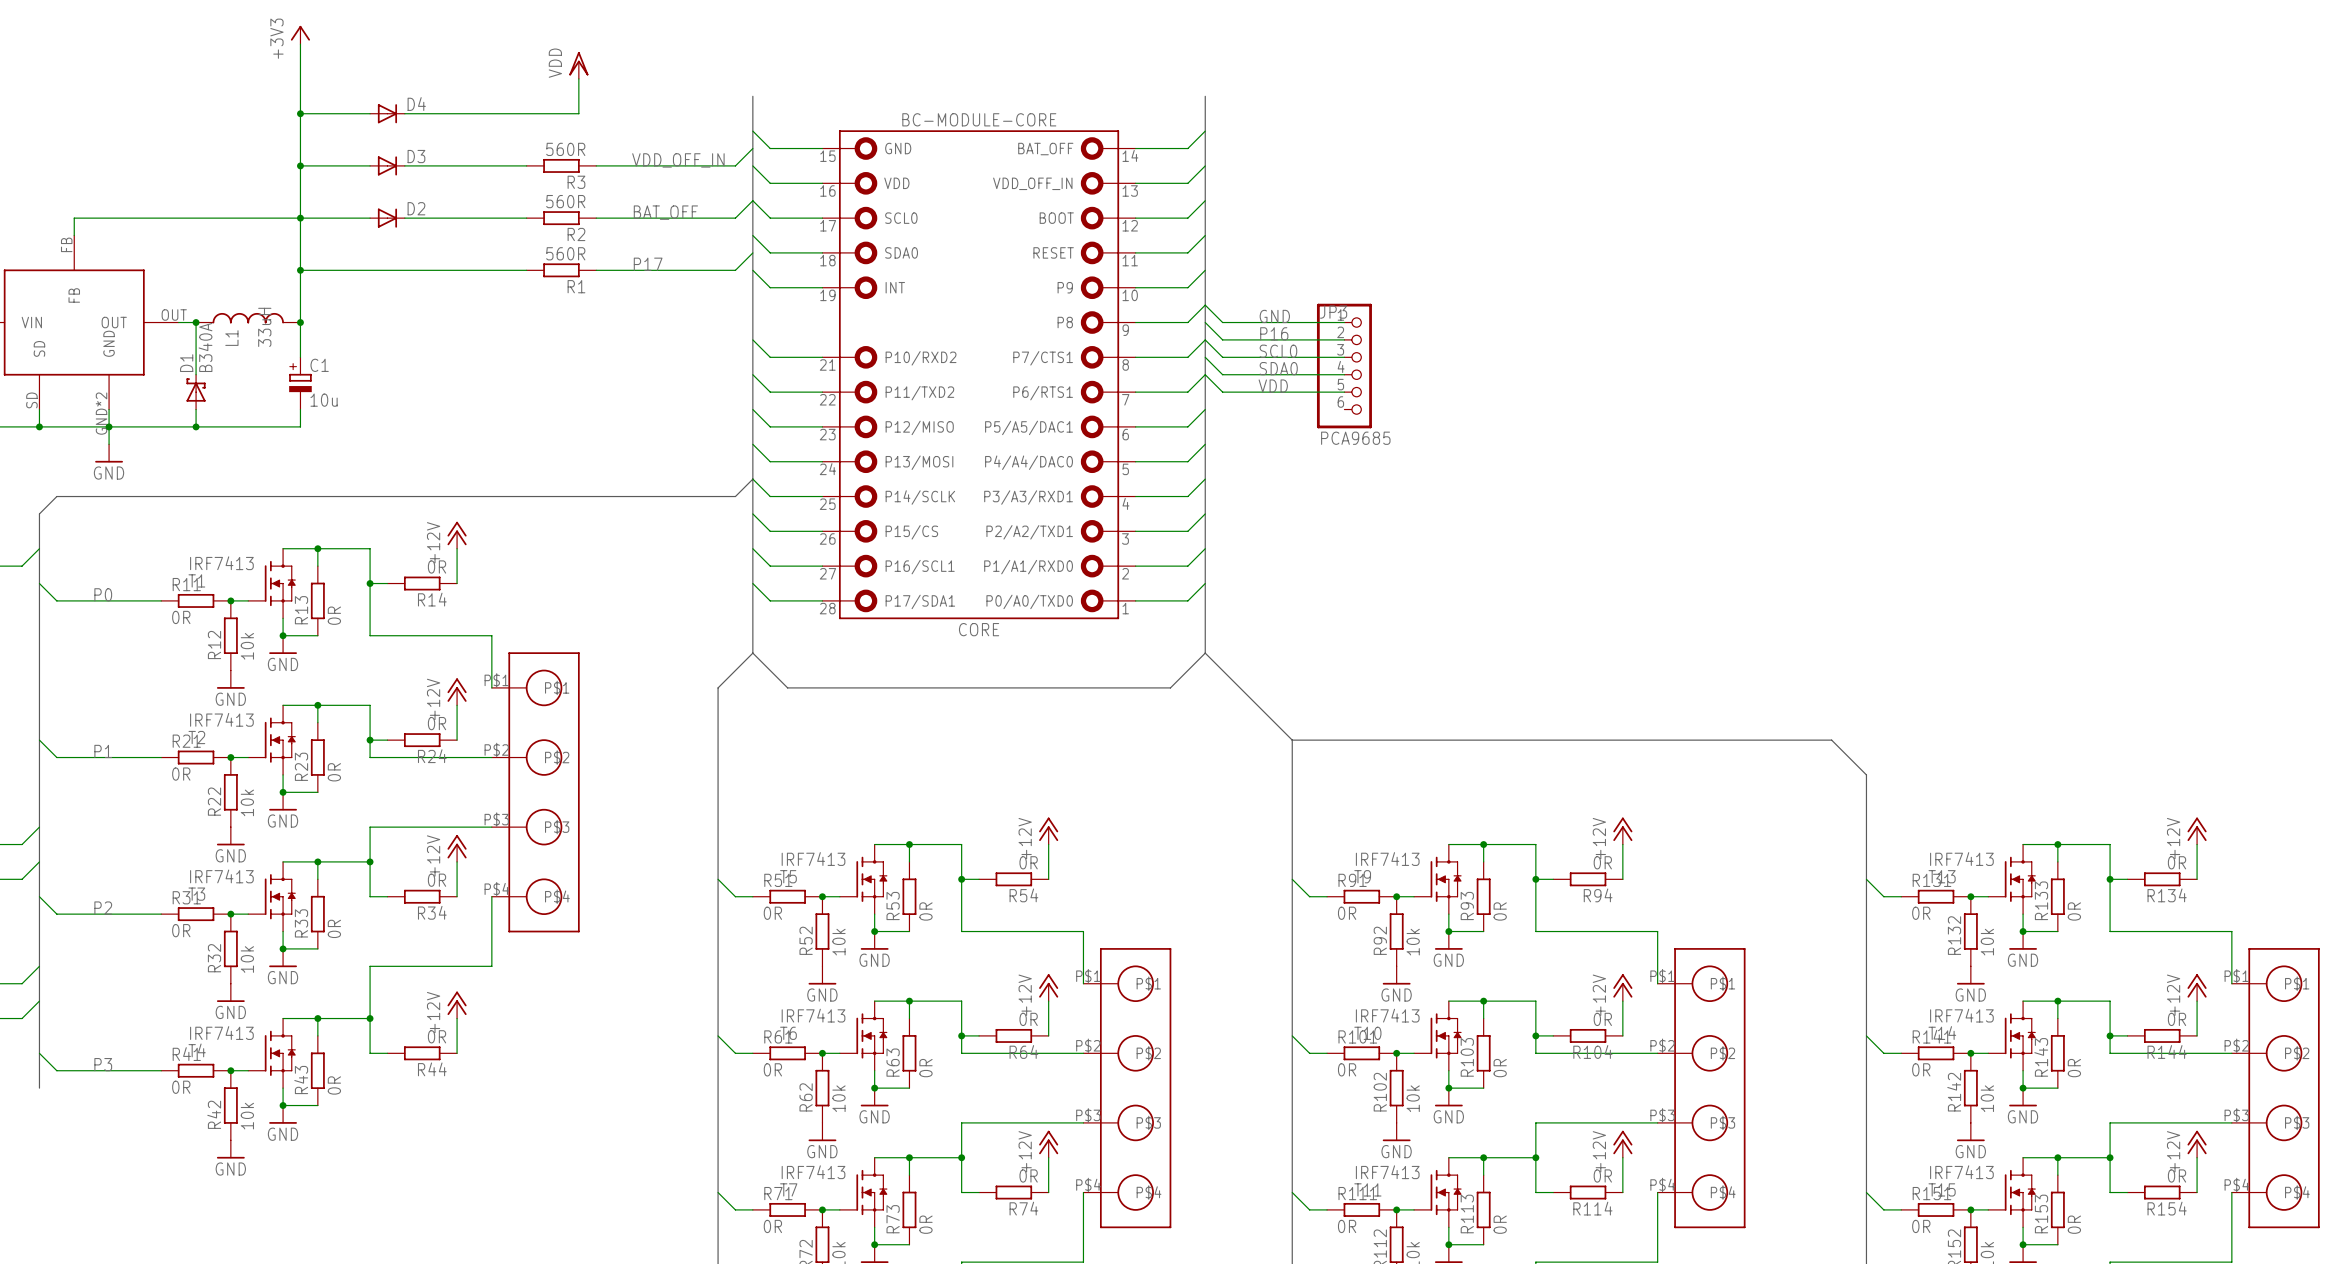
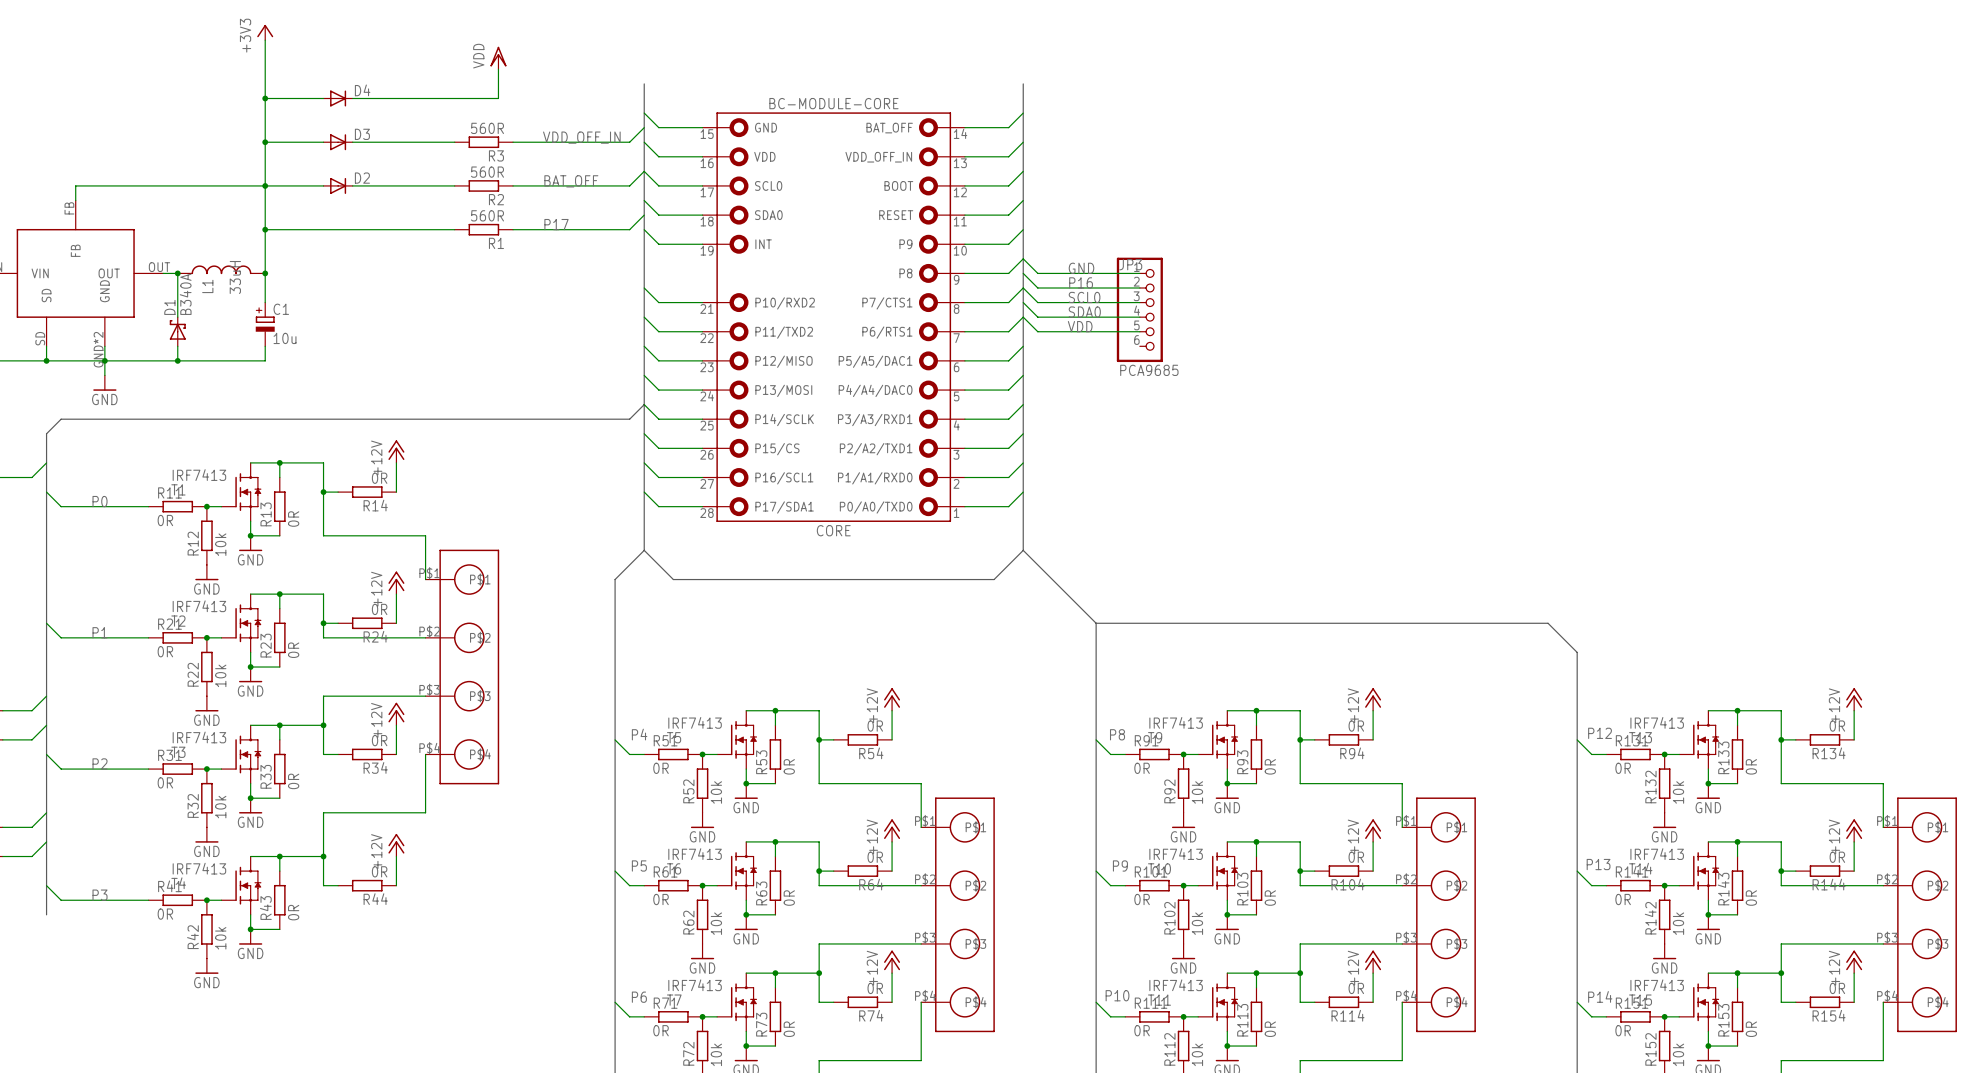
label: none -> P12 (1600, 733)
label: none -> P4 (639, 734)
label: none -> P8 (1117, 734)
label: none -> P13 (1598, 864)
label: none -> P5 (639, 865)
label: none -> P9 (1120, 865)
label: none -> P10 (1117, 995)
label: none -> P6 (639, 997)
label: none -> P14 (1600, 996)

